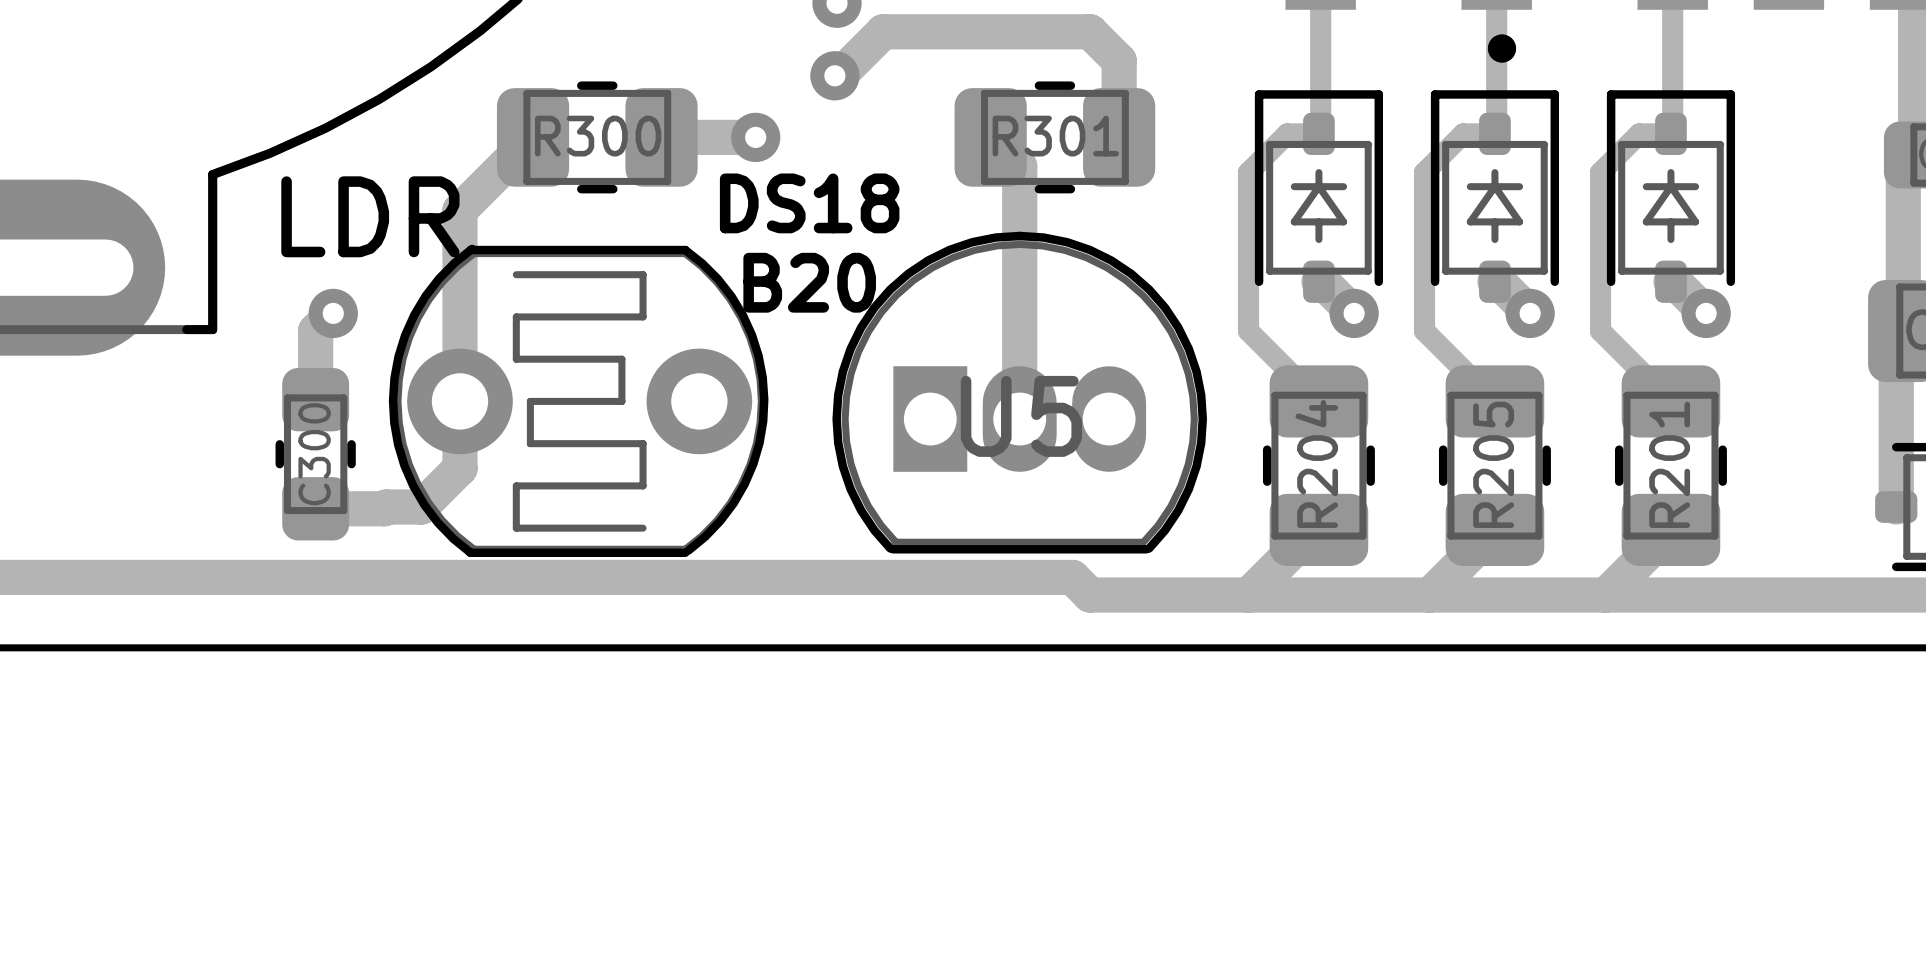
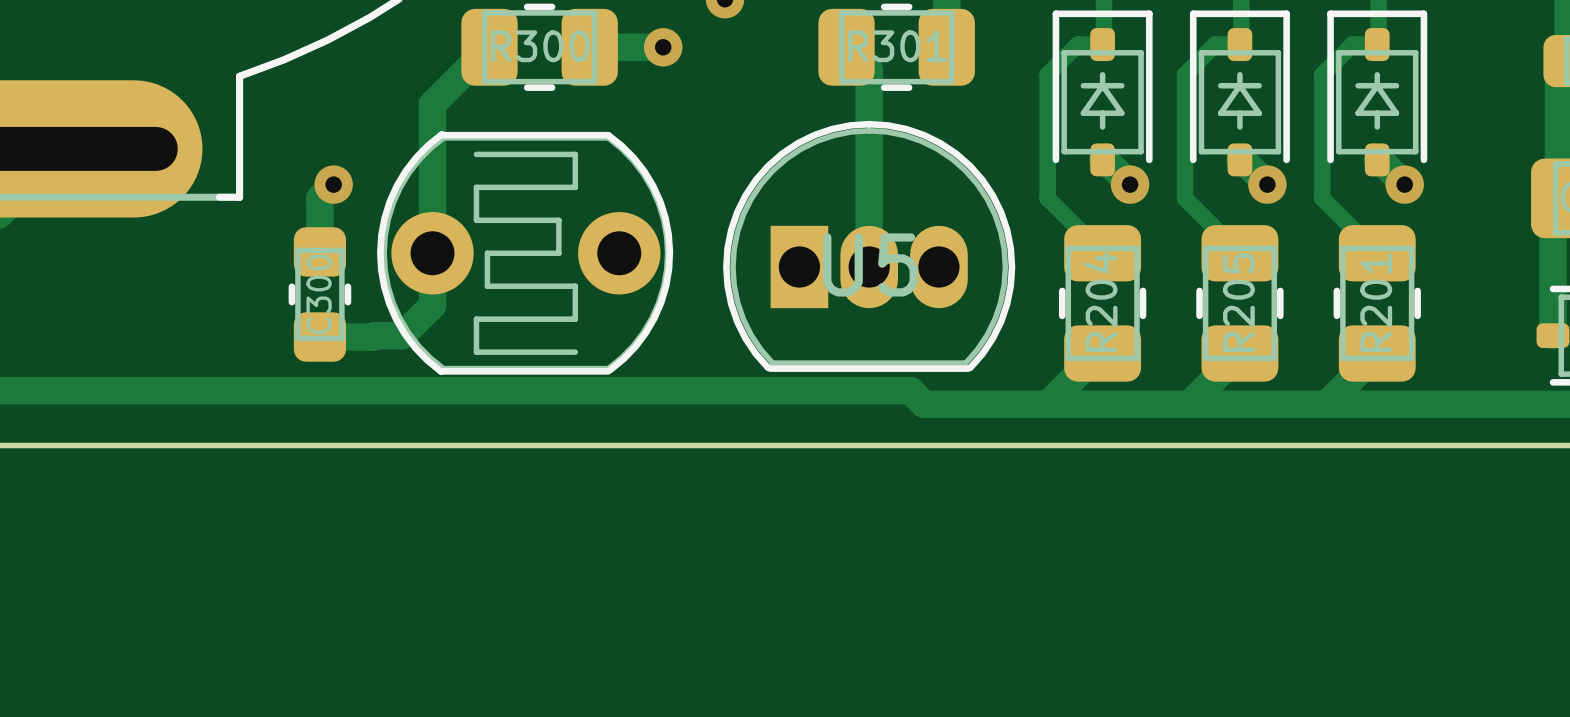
text: DS18 (809, 203) -> none
text: LDR (370, 216) -> none
text: B20 (809, 282) -> none

